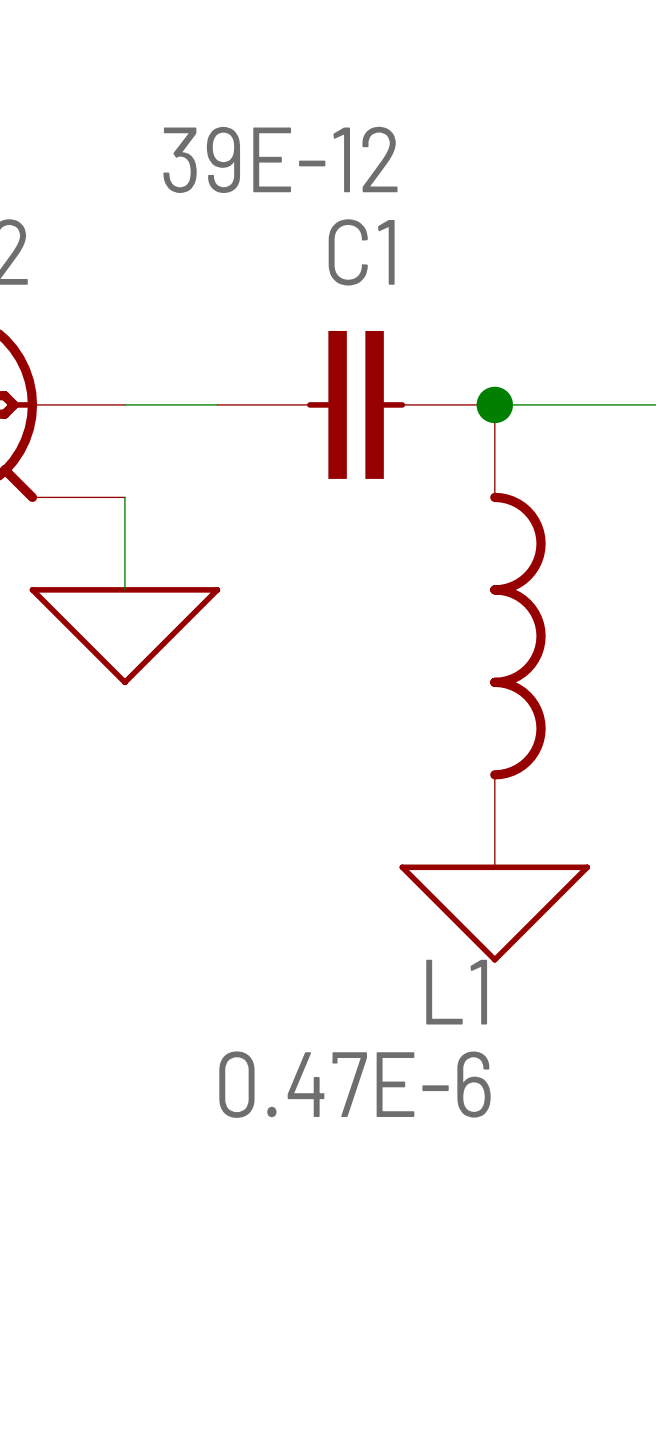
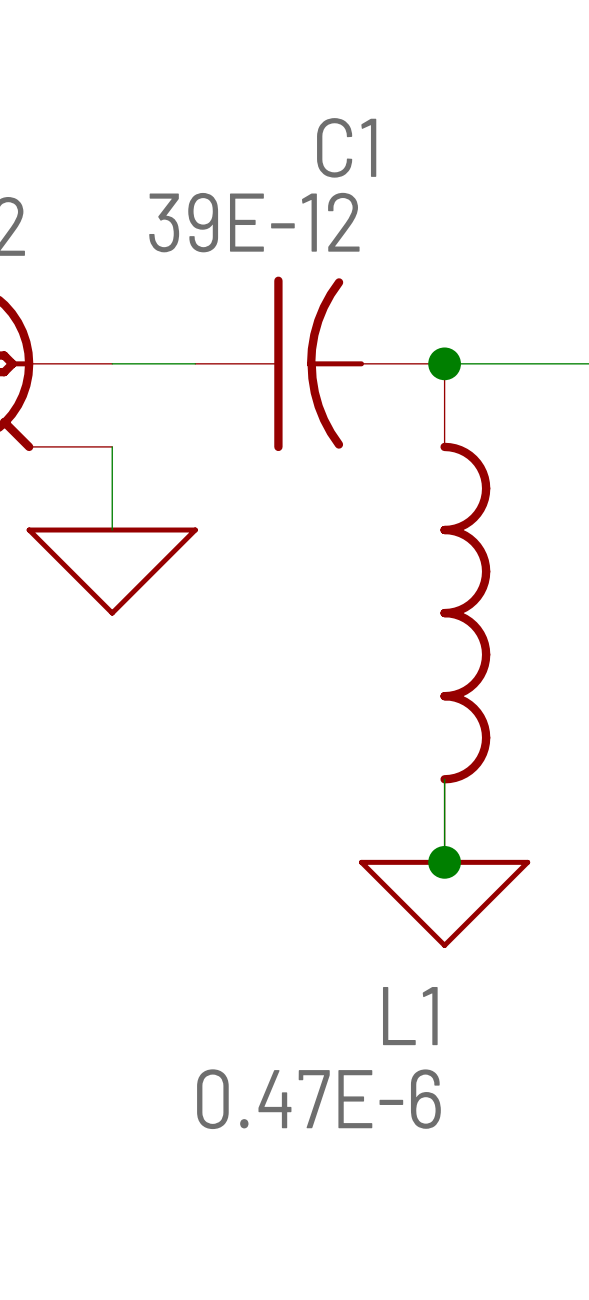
C1 value position: 39E-12 (280, 159) -> 39E-12 (254, 222)
C1 name position: C1 (361, 252) -> C1 (346, 147)
C1 symbol: [217, 330, 495, 479] -> [195, 276, 445, 452]
L1 symbol: [490, 404, 546, 868] -> [440, 363, 491, 863]
wire: none -> (444, 779) (444, 862)
power symbol position: (494, 913) -> (444, 903)
junction: none -> (444, 862)
L1 name position: L1 (456, 992) -> L1 (410, 1016)
L1 value position: 0.47E-6 (354, 1084) -> 0.47E-6 (318, 1099)

